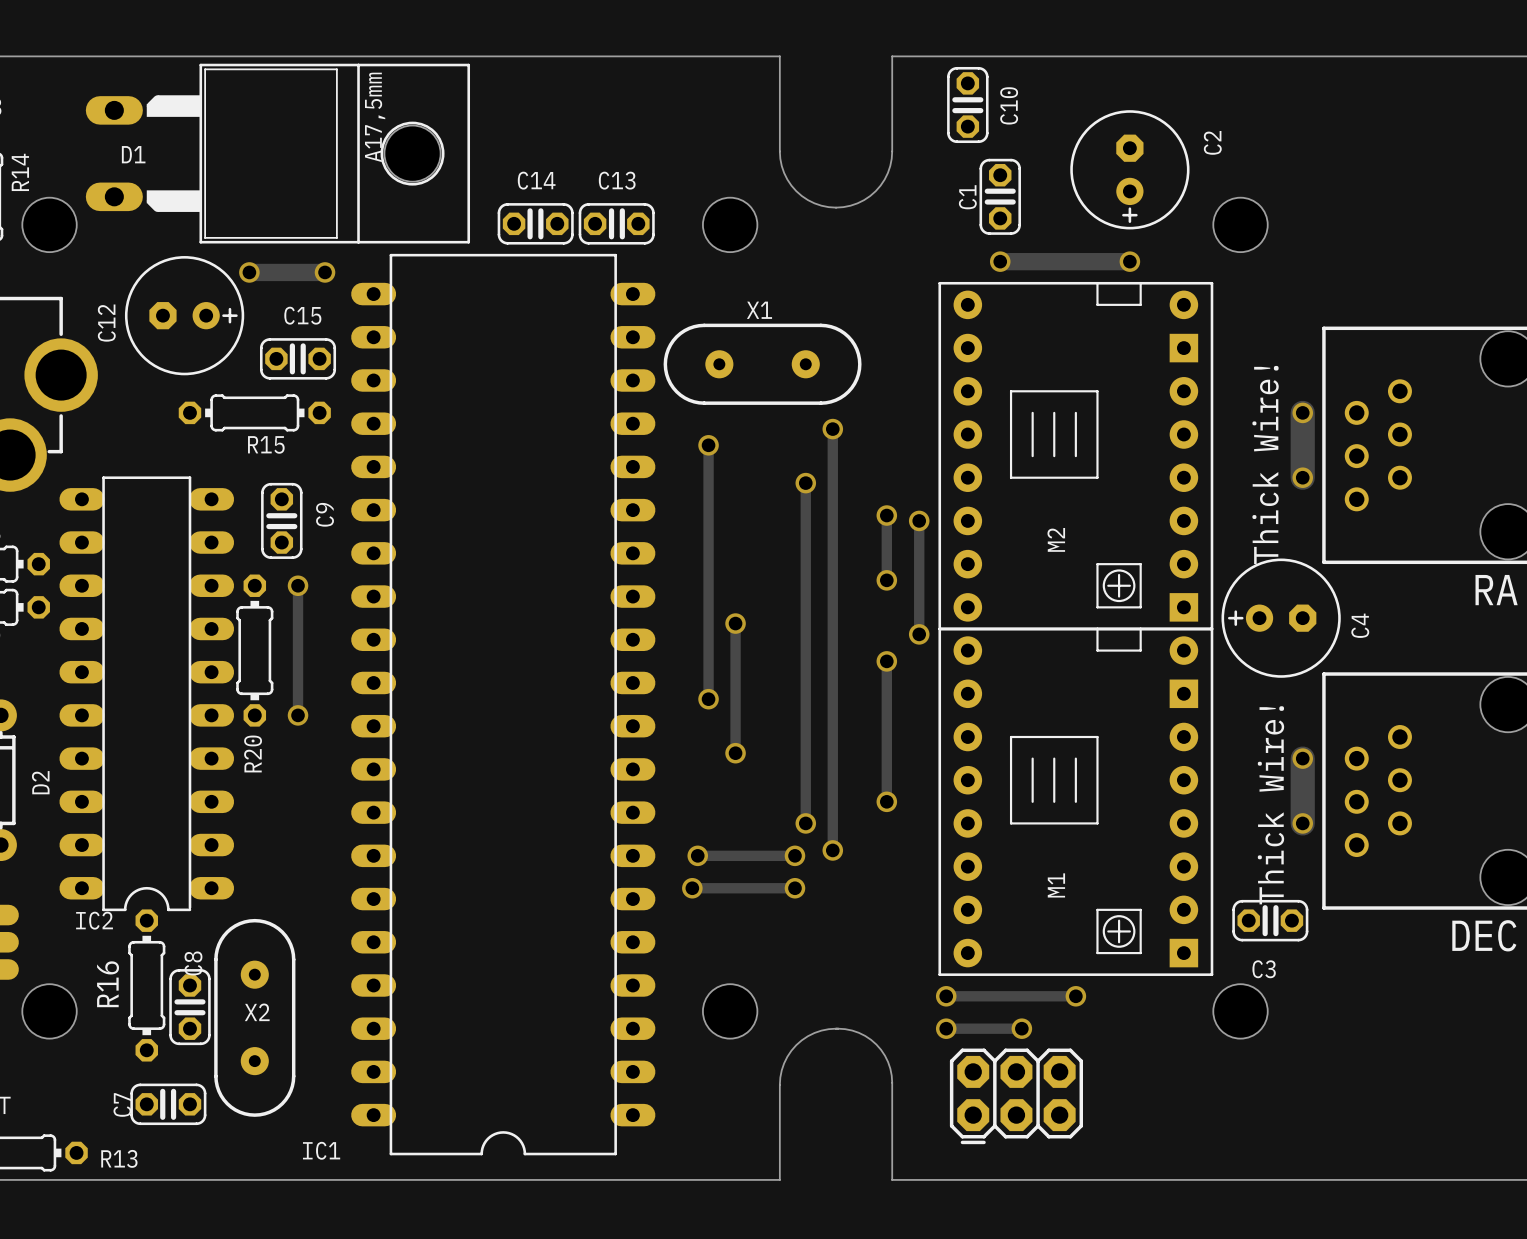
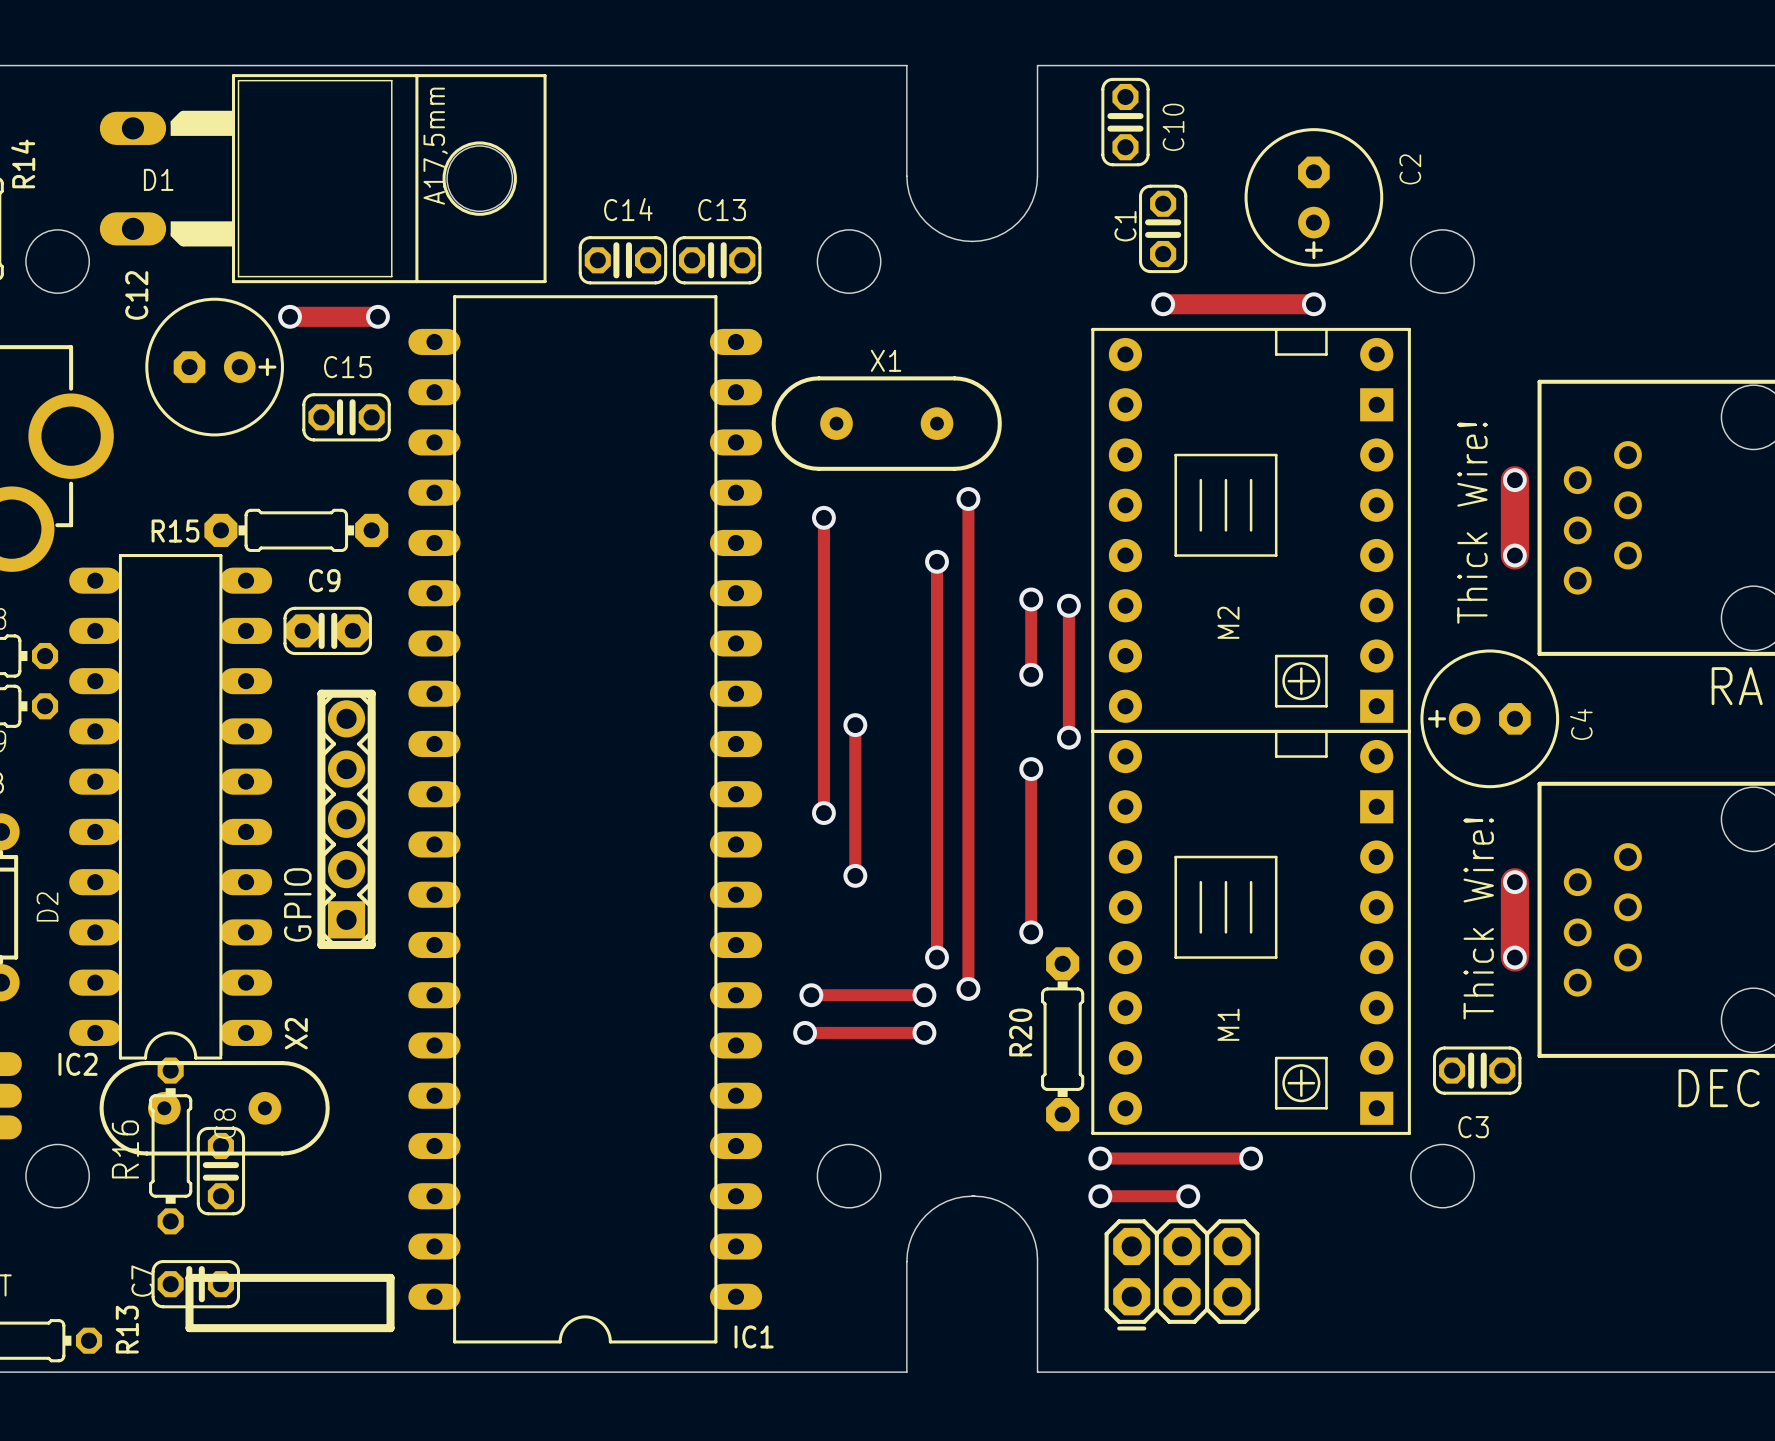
R14 name position: R14 (20, 172) -> R14 (23, 163)
C12 name position: C12 (106, 323) -> C12 (136, 295)
R15 footprint: [178, 394, 331, 432] -> [204, 508, 389, 553]
R15 name position: R15 (266, 444) -> R15 (175, 531)
C9 footprint: [261, 482, 303, 559] -> [283, 606, 372, 656]
C9 name position: C9 (325, 514) -> C9 (324, 580)
R20 footprint: [236, 574, 274, 727] -> [1041, 947, 1085, 1132]
track: (298, 585) (298, 715) -> none
via: (298, 585) -> none
line: none -> (321, 693) (371, 693) (371, 944) (321, 944) (321, 693)
GPIO: none -> (346, 819)
via: (298, 715) -> none
R20 name position: R20 (253, 753) -> R20 (1020, 1032)
IC2 name position: IC2 (94, 920) -> IC2 (78, 1064)
X2 name position: X2 (257, 1012) -> X2 (296, 1033)
X2 rotation: 0° (254, 1017) -> 90° clockwise (214, 1108)
line: none -> (189, 1277) (189, 1328) (390, 1328) (390, 1277) (189, 1277)
IC1 name position: IC1 (321, 1150) -> IC1 (754, 1336)
R13 name rotation: 0° (119, 1158) -> 90° counterclockwise (127, 1329)

